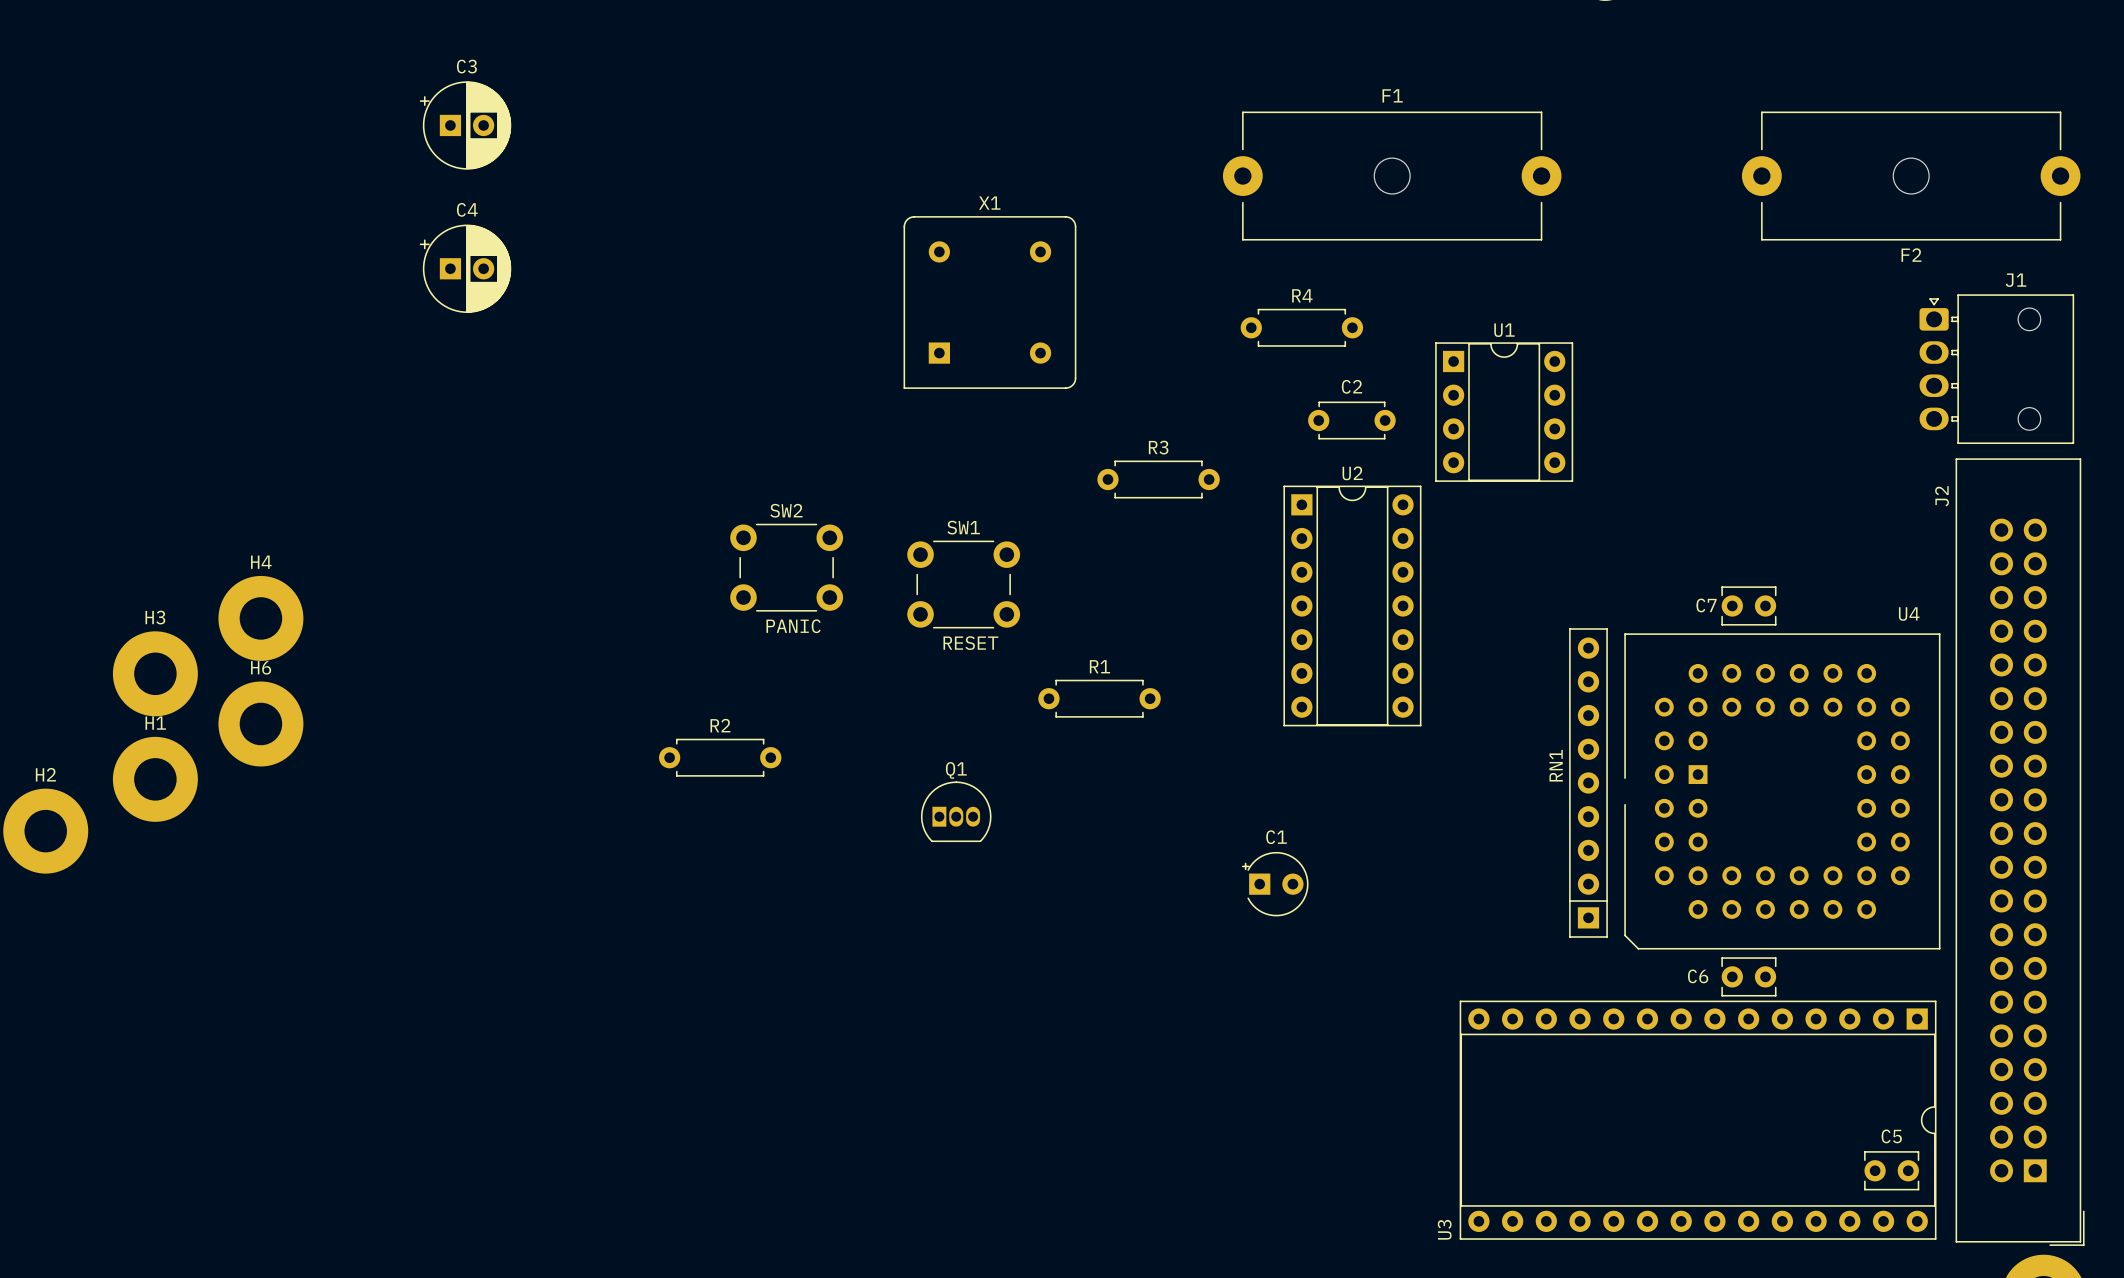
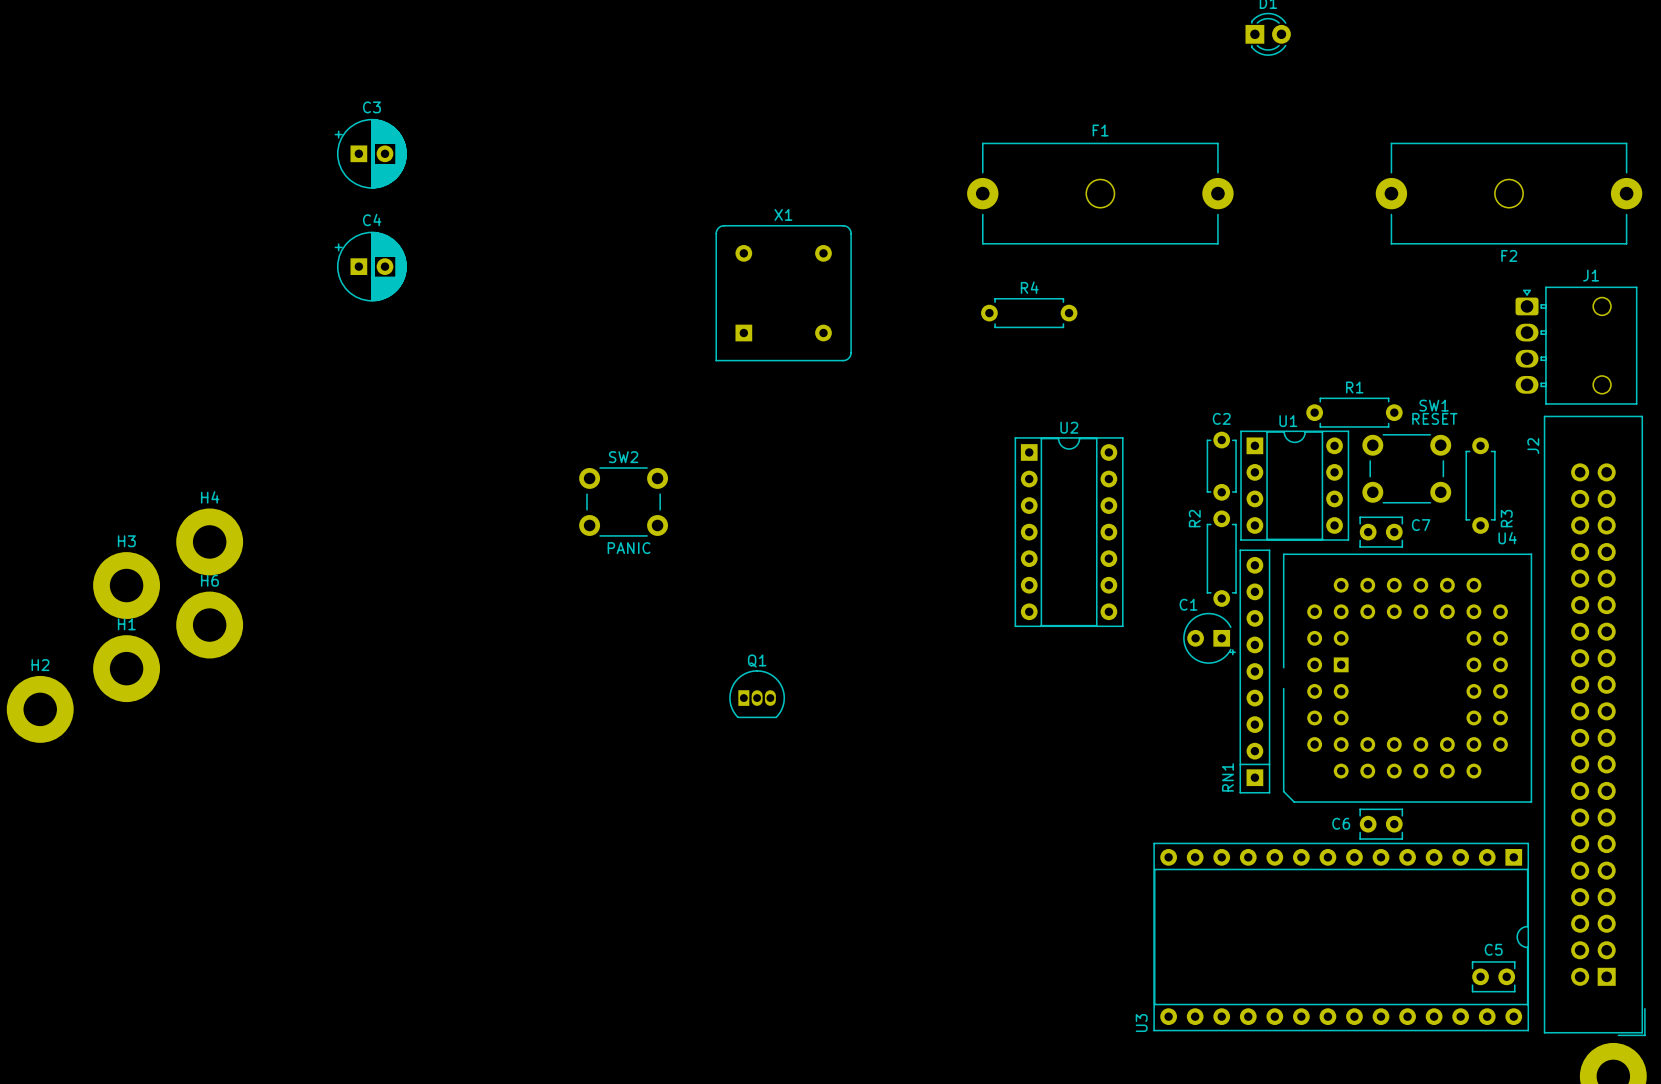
U1 name position: U1 (1504, 330) -> U1 (1288, 421)
U1 position: (1504, 412) -> (1294, 485)
C2 rotation: 0° (1351, 420) -> 90° clockwise (1221, 466)
C2 position: (1351, 420) -> (1221, 466)
R3 name position: R3 (1158, 447) -> R3 (1506, 518)
R3 rotation: 0° (1158, 479) -> 90° clockwise (1480, 485)
R3 position: (1158, 479) -> (1480, 485)
SW1 name position: SW1 (963, 527) -> SW1 (1434, 405)
SW1 position: (963, 584) -> (1406, 468)
C7 name position: C7 (1706, 605) -> C7 (1421, 525)
SW1 value position: RESET (970, 643) -> RESET (1434, 418)
R1 position: (1099, 698) -> (1354, 412)
R2 name position: R2 (720, 725) -> R2 (1194, 518)
R2 rotation: 0° (720, 757) -> 90° clockwise (1221, 558)
R2 position: (720, 757) -> (1221, 558)
RN1 name position: RN1 (1556, 765) -> RN1 (1227, 777)
C1 name position: C1 (1276, 837) -> C1 (1188, 604)
C1 rotation: 0° (1275, 884) -> 180° (1209, 638)
C1 position: (1275, 884) -> (1209, 638)

